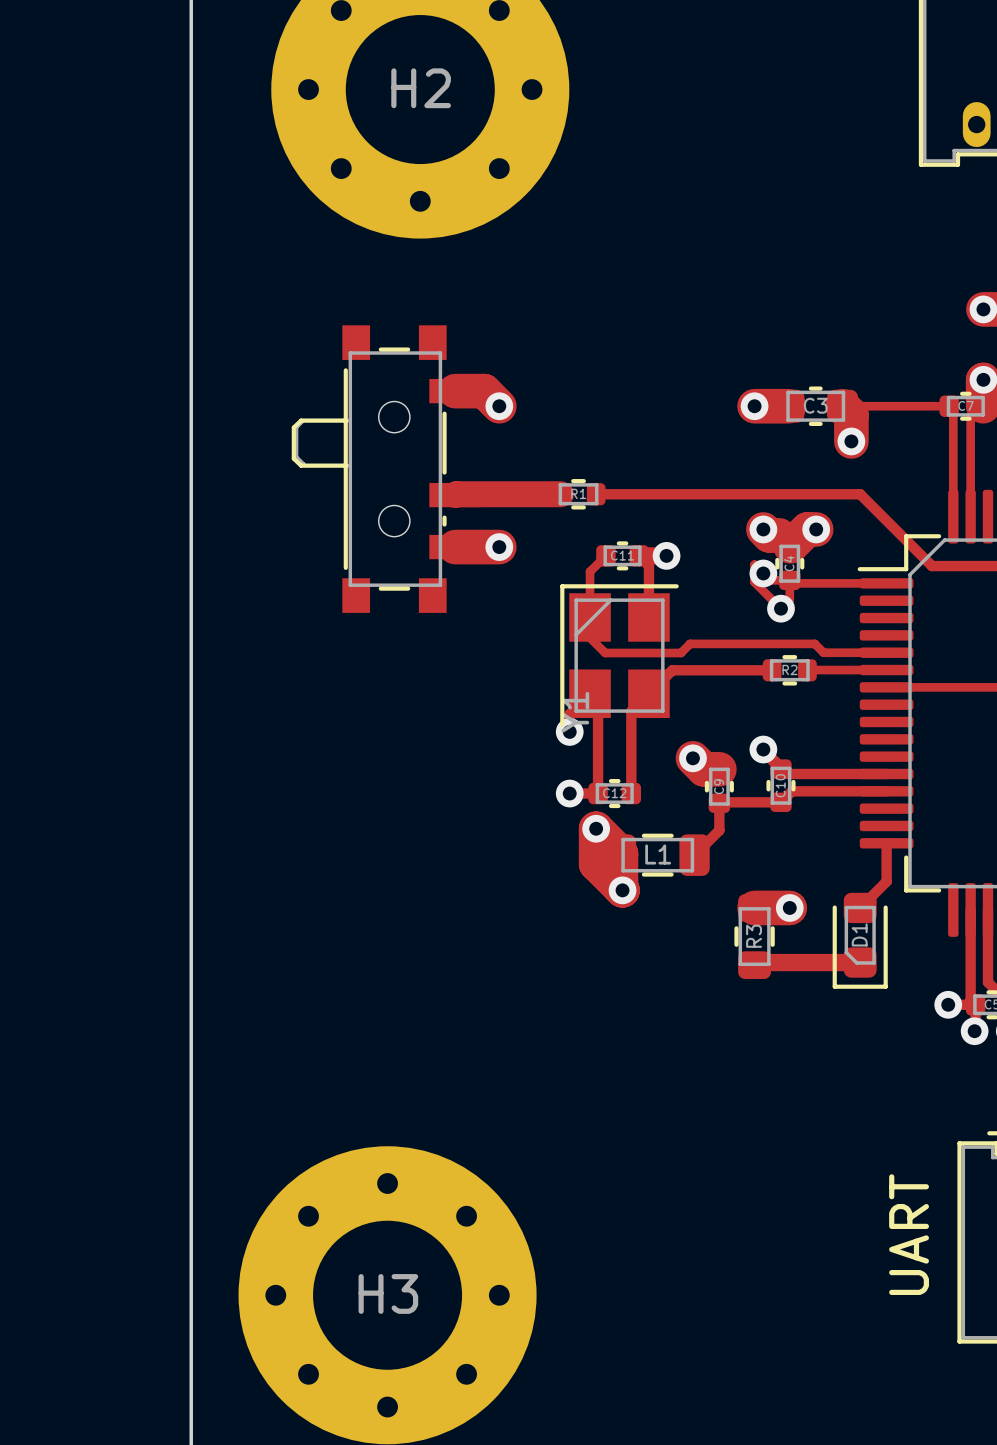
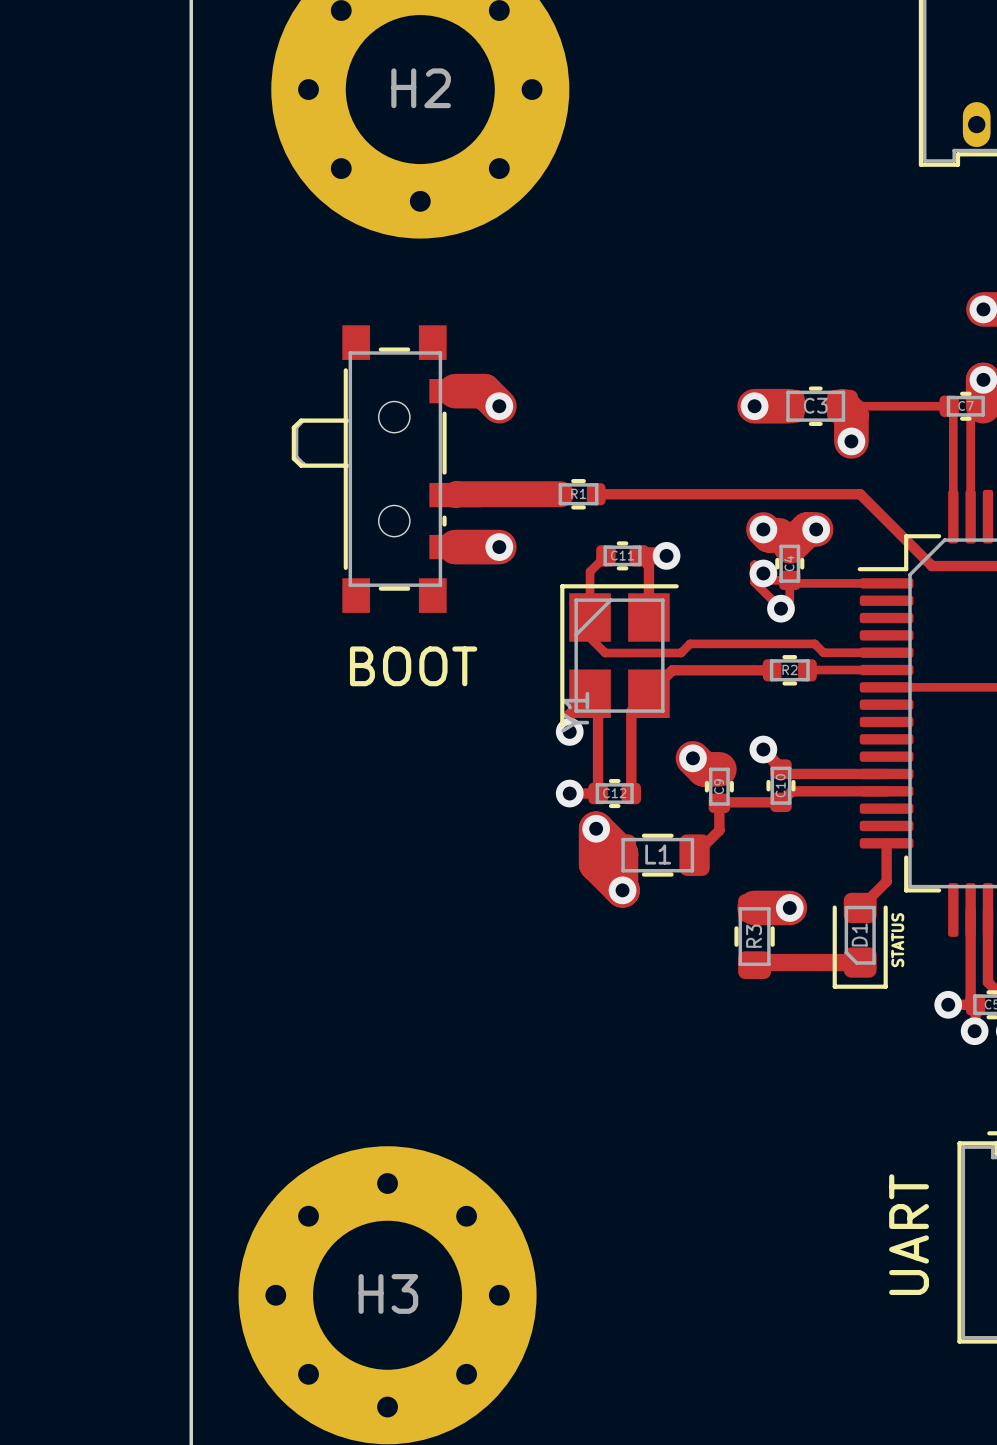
text: none -> BOOT (413, 666)
text: none -> STATUS (897, 940)

